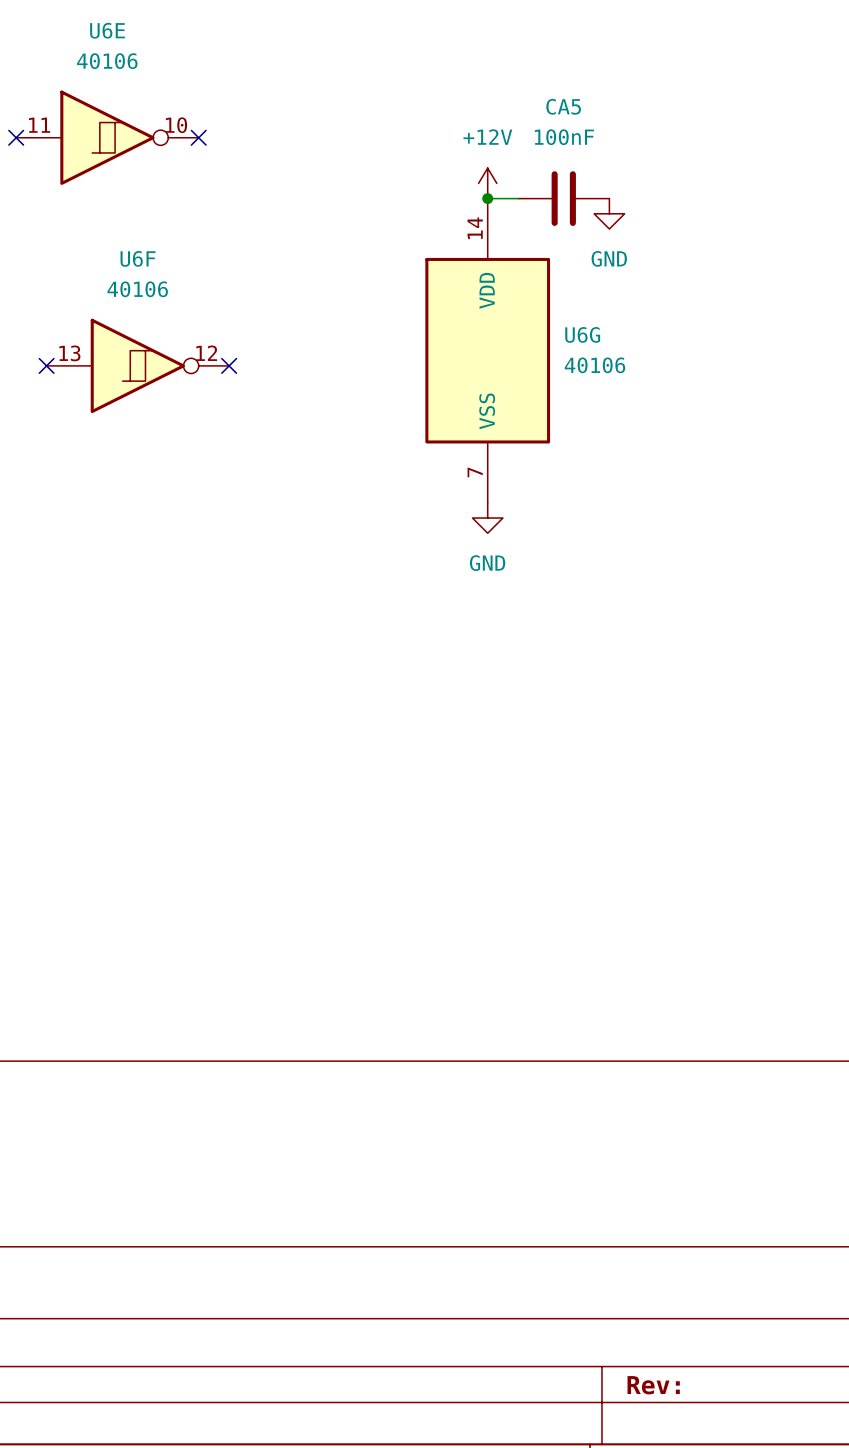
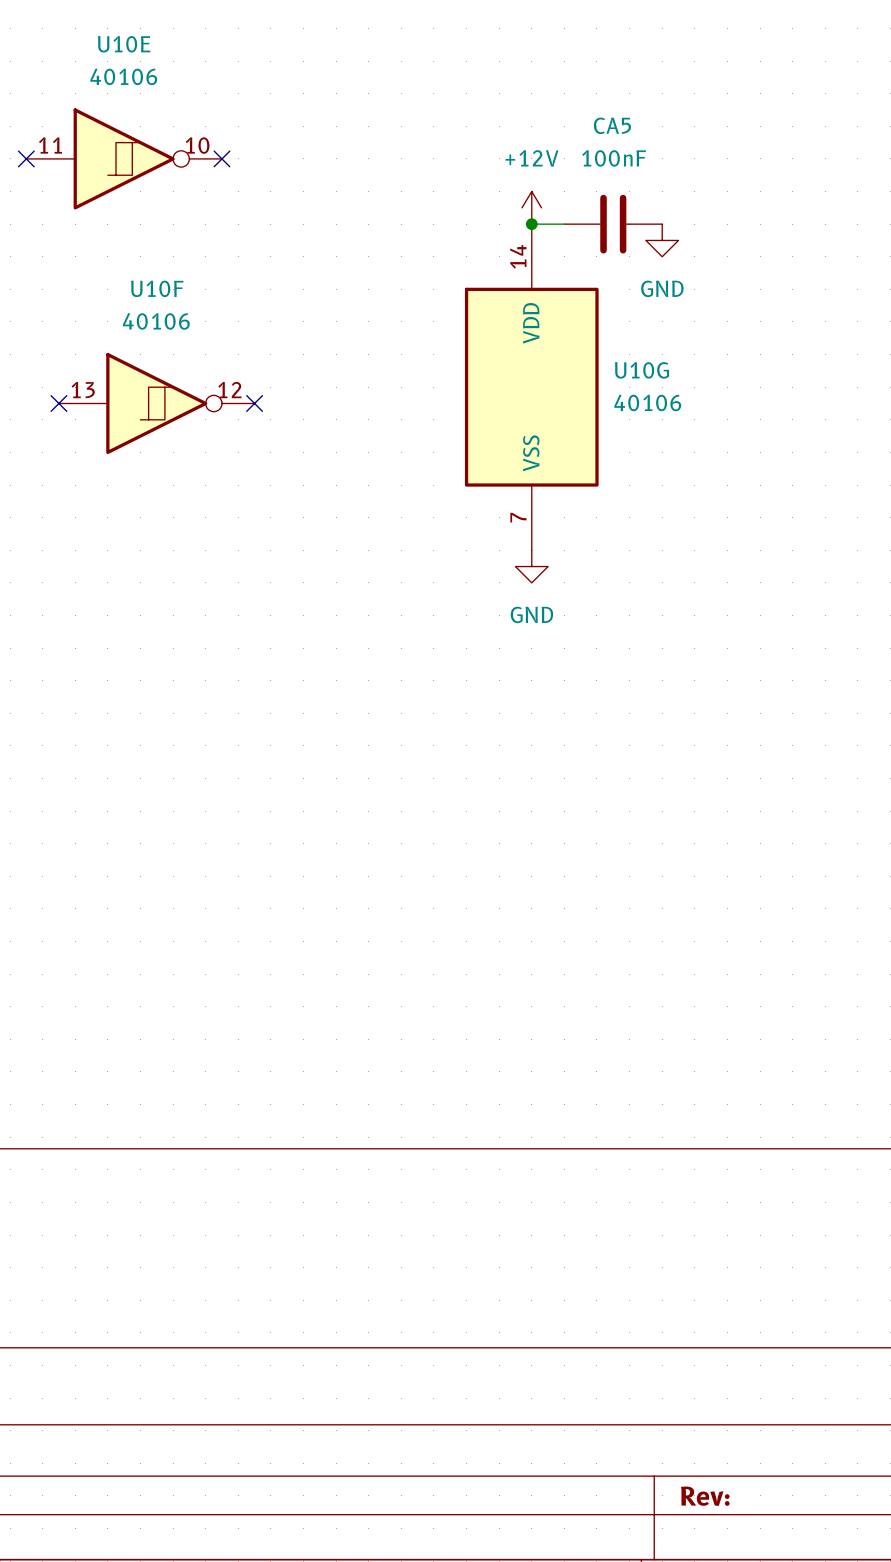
U6E name: U6E (107, 30) -> U10E (124, 44)
U6F name: U6F (138, 258) -> U10F (157, 288)
U6G name: U6G (582, 334) -> U10G (641, 370)

